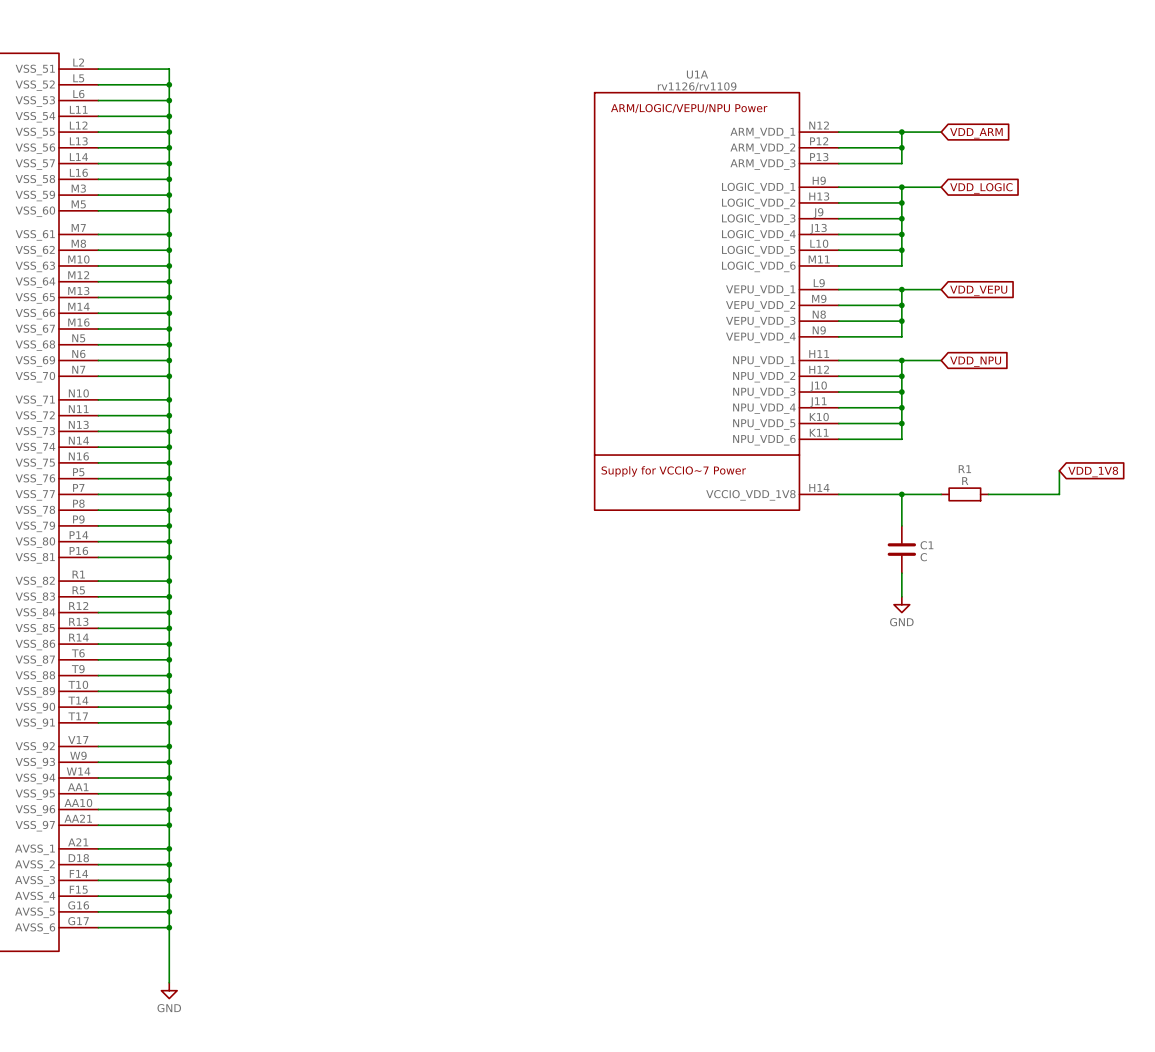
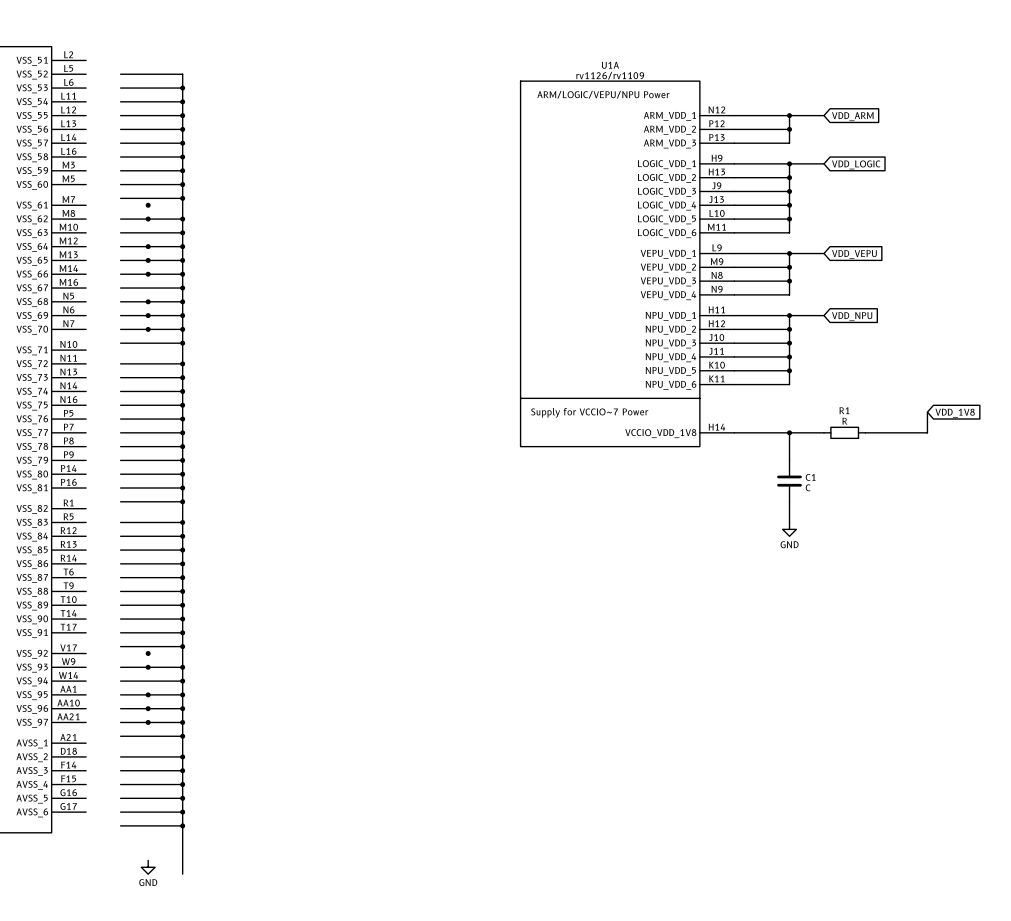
wire: (98, 69) (169, 69) (169, 982) -> none
wire: (98, 84) (137, 84) -> none
wire: none -> (148, 74) (182, 74) (182, 874)
junction: (169, 84) -> none
wire: (98, 100) (137, 100) -> (148, 88) (182, 88)
junction: (169, 100) -> none
junction: none -> (182, 88)
wire: (98, 116) (137, 116) -> (148, 101) (182, 101)
junction: (169, 116) -> none
junction: none -> (182, 101)
wire: (98, 132) (137, 132) -> (148, 115) (182, 115)
junction: (169, 132) -> none
junction: none -> (182, 115)
wire: (98, 147) (137, 147) -> (148, 129) (182, 129)
junction: (169, 147) -> none
junction: none -> (182, 129)
wire: (98, 163) (137, 163) -> (148, 143) (182, 143)
junction: (169, 163) -> none
junction: none -> (182, 143)
wire: (98, 179) (137, 179) -> (148, 156) (182, 156)
junction: (169, 179) -> none
junction: none -> (182, 156)
wire: (98, 195) (137, 195) -> (148, 170) (182, 170)
junction: (169, 195) -> none
junction: none -> (182, 170)
wire: (98, 210) (137, 210) -> (148, 184) (182, 184)
junction: (169, 210) -> none
junction: none -> (182, 184)
junction: none -> (182, 198)
wire: (98, 234) (169, 234) -> (120, 198) (182, 198)
wire: (98, 250) (137, 250) -> (148, 219) (182, 219)
junction: none -> (182, 219)
wire: (98, 265) (137, 265) -> (148, 232) (182, 232)
junction: (169, 265) -> none
junction: none -> (182, 232)
wire: (98, 281) (137, 281) -> (148, 246) (182, 246)
junction: none -> (182, 246)
wire: (98, 297) (137, 297) -> (148, 260) (182, 260)
junction: none -> (182, 260)
wire: (98, 313) (137, 313) -> (148, 274) (182, 274)
junction: none -> (182, 274)
wire: (98, 329) (137, 329) -> (148, 288) (182, 288)
junction: (169, 329) -> none
junction: none -> (182, 288)
wire: (98, 344) (137, 344) -> (148, 301) (182, 301)
junction: none -> (182, 301)
wire: (98, 360) (137, 360) -> (148, 315) (182, 315)
junction: none -> (182, 315)
wire: (98, 376) (137, 376) -> (148, 329) (182, 329)
junction: none -> (182, 329)
junction: none -> (182, 343)
wire: (98, 399) (169, 399) -> (120, 343) (182, 343)
junction: (169, 399) -> none
wire: (98, 415) (137, 415) -> (148, 363) (182, 363)
junction: (169, 415) -> none
junction: none -> (182, 363)
wire: (98, 431) (137, 431) -> (148, 377) (182, 377)
junction: (169, 431) -> none
junction: none -> (182, 377)
wire: (98, 447) (137, 447) -> (148, 391) (182, 391)
junction: (169, 447) -> none
junction: none -> (182, 391)
wire: (98, 462) (137, 462) -> (148, 405) (182, 405)
junction: (169, 462) -> none
junction: none -> (182, 405)
wire: (98, 478) (137, 478) -> (148, 419) (182, 419)
junction: (169, 478) -> none
junction: none -> (182, 419)
wire: (98, 494) (137, 494) -> (148, 432) (182, 432)
junction: (169, 494) -> none
junction: none -> (182, 432)
wire: (98, 510) (137, 510) -> (148, 446) (182, 446)
junction: (169, 510) -> none
junction: none -> (182, 446)
wire: (98, 525) (137, 525) -> (148, 460) (182, 460)
junction: (169, 525) -> none
junction: none -> (182, 460)
wire: (98, 541) (137, 541) -> (148, 474) (182, 474)
junction: (169, 541) -> none
junction: none -> (182, 474)
wire: (98, 557) (137, 557) -> (148, 488) (182, 488)
junction: (169, 557) -> none
junction: none -> (182, 488)
junction: none -> (182, 501)
wire: (98, 581) (169, 581) -> (120, 501) (182, 501)
junction: (169, 581) -> none
wire: (98, 596) (137, 596) -> (148, 522) (182, 522)
junction: (169, 596) -> none
junction: none -> (182, 522)
wire: (98, 612) (137, 612) -> (148, 536) (182, 536)
junction: (169, 612) -> none
junction: none -> (182, 536)
wire: (98, 628) (137, 628) -> (148, 550) (182, 550)
junction: (169, 628) -> none
junction: none -> (182, 550)
wire: (98, 644) (137, 644) -> (148, 563) (182, 563)
junction: (169, 644) -> none
junction: none -> (182, 563)
wire: (98, 659) (137, 659) -> (148, 577) (182, 577)
junction: (169, 659) -> none
junction: none -> (182, 577)
wire: (98, 675) (137, 675) -> (148, 591) (182, 591)
junction: (169, 675) -> none
junction: none -> (182, 591)
wire: (98, 691) (137, 691) -> (148, 605) (182, 605)
junction: (169, 691) -> none
junction: none -> (182, 605)
wire: (98, 707) (137, 707) -> (148, 619) (182, 619)
junction: (169, 707) -> none
junction: none -> (182, 619)
wire: (98, 722) (137, 722) -> (148, 632) (182, 632)
junction: (169, 722) -> none
junction: none -> (182, 632)
junction: none -> (182, 646)
wire: (98, 746) (169, 746) -> (120, 646) (182, 646)
wire: (98, 762) (137, 762) -> (148, 667) (182, 667)
junction: none -> (182, 667)
wire: (98, 777) (137, 777) -> (148, 681) (182, 681)
junction: (169, 777) -> none
junction: none -> (182, 681)
wire: (98, 793) (137, 793) -> (148, 694) (182, 694)
junction: none -> (182, 694)
wire: (98, 809) (137, 809) -> (148, 708) (182, 708)
junction: none -> (182, 708)
wire: (98, 825) (137, 825) -> (148, 722) (182, 722)
junction: none -> (182, 722)
junction: none -> (182, 736)
wire: (98, 848) (169, 848) -> (120, 736) (182, 736)
junction: (169, 848) -> none
wire: (98, 864) (137, 864) -> (148, 756) (182, 756)
junction: (169, 864) -> none
junction: none -> (182, 756)
wire: (98, 880) (137, 880) -> (148, 770) (182, 770)
junction: (169, 880) -> none
junction: none -> (182, 770)
wire: (98, 896) (137, 896) -> (148, 784) (182, 784)
junction: (169, 896) -> none
junction: none -> (182, 784)
wire: (98, 911) (137, 911) -> (148, 798) (182, 798)
junction: (169, 911) -> none
junction: none -> (182, 798)
wire: (98, 927) (137, 927) -> (148, 812) (182, 812)
junction: (169, 927) -> none
junction: none -> (182, 812)
wire: none -> (120, 825) (182, 825)
junction: none -> (182, 825)

